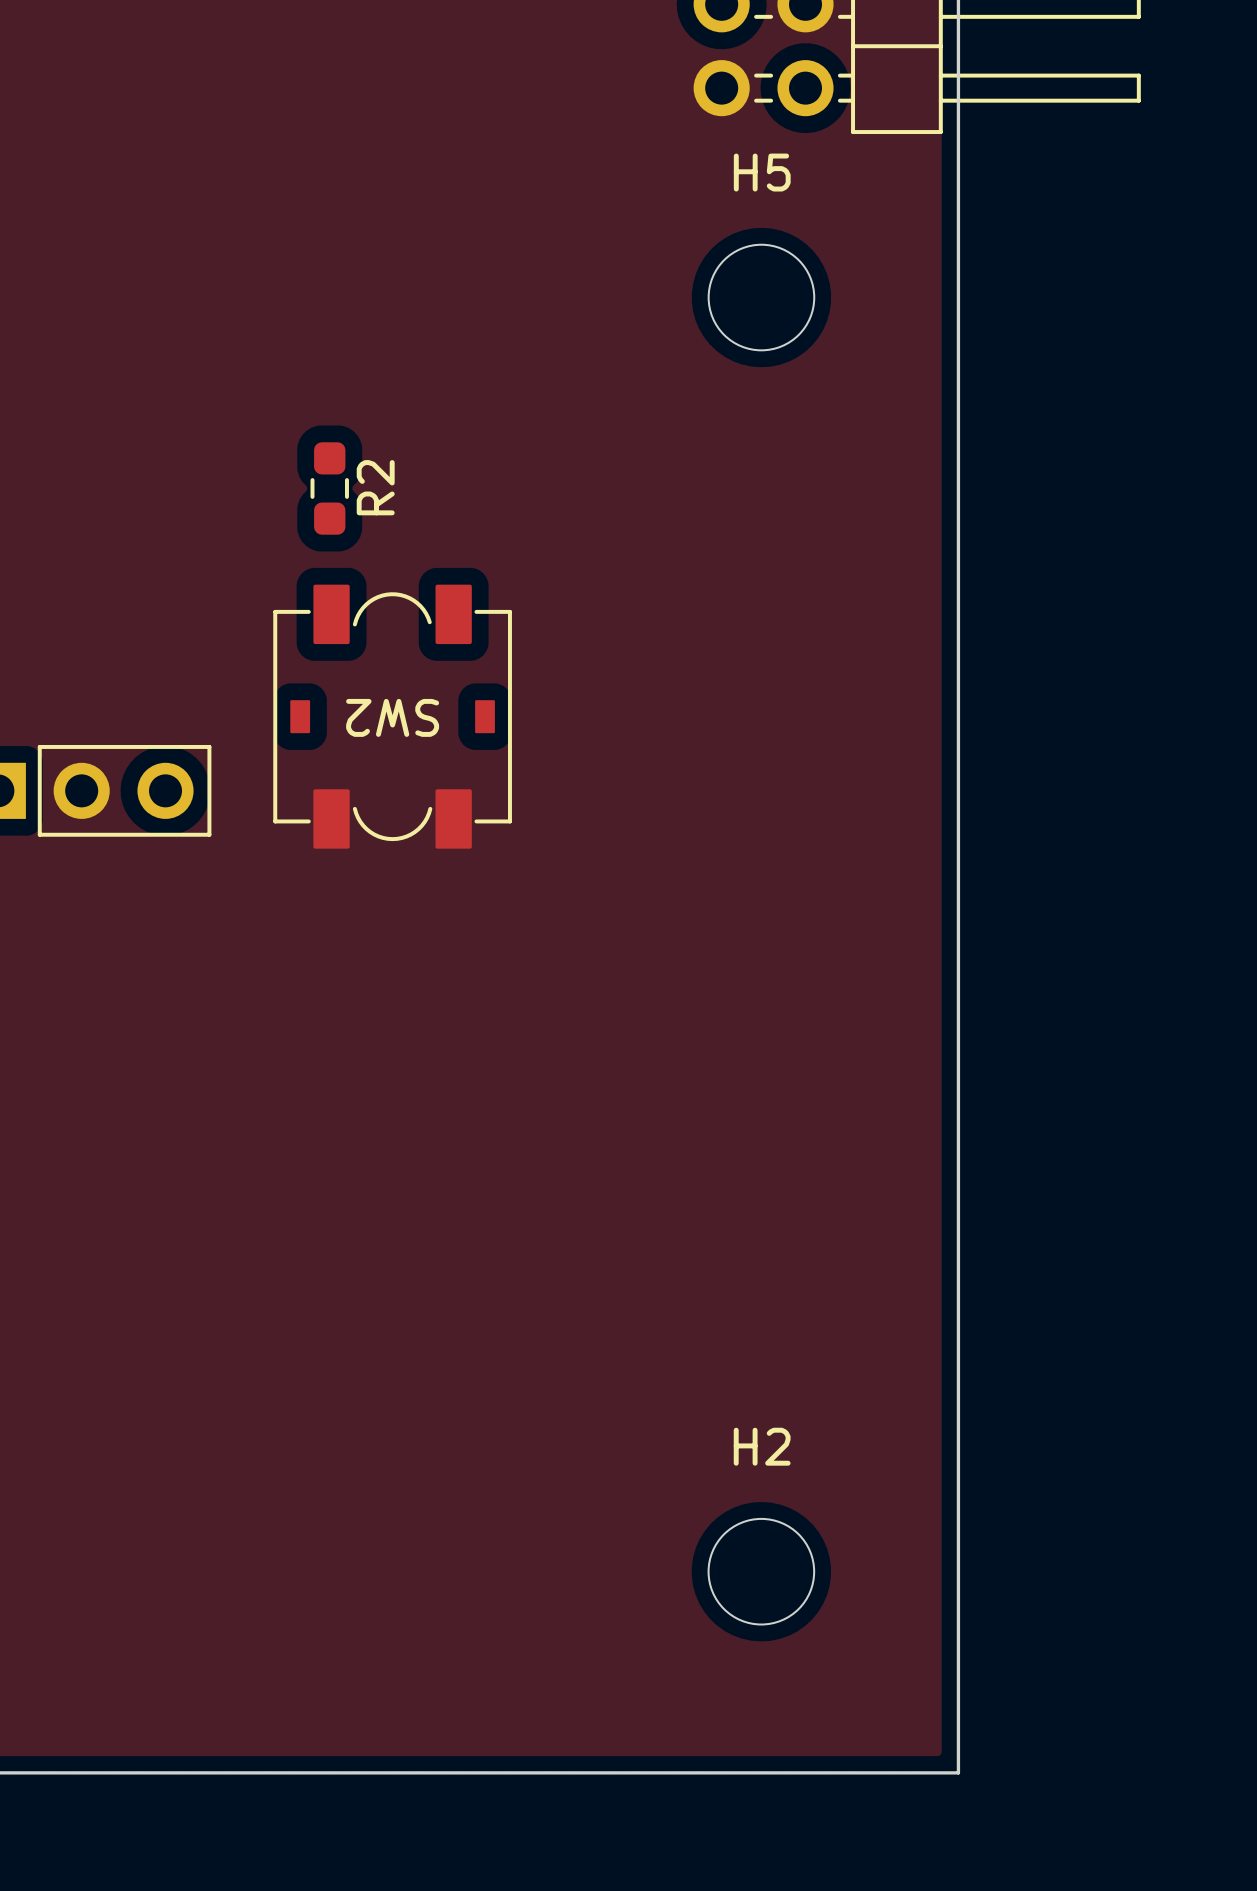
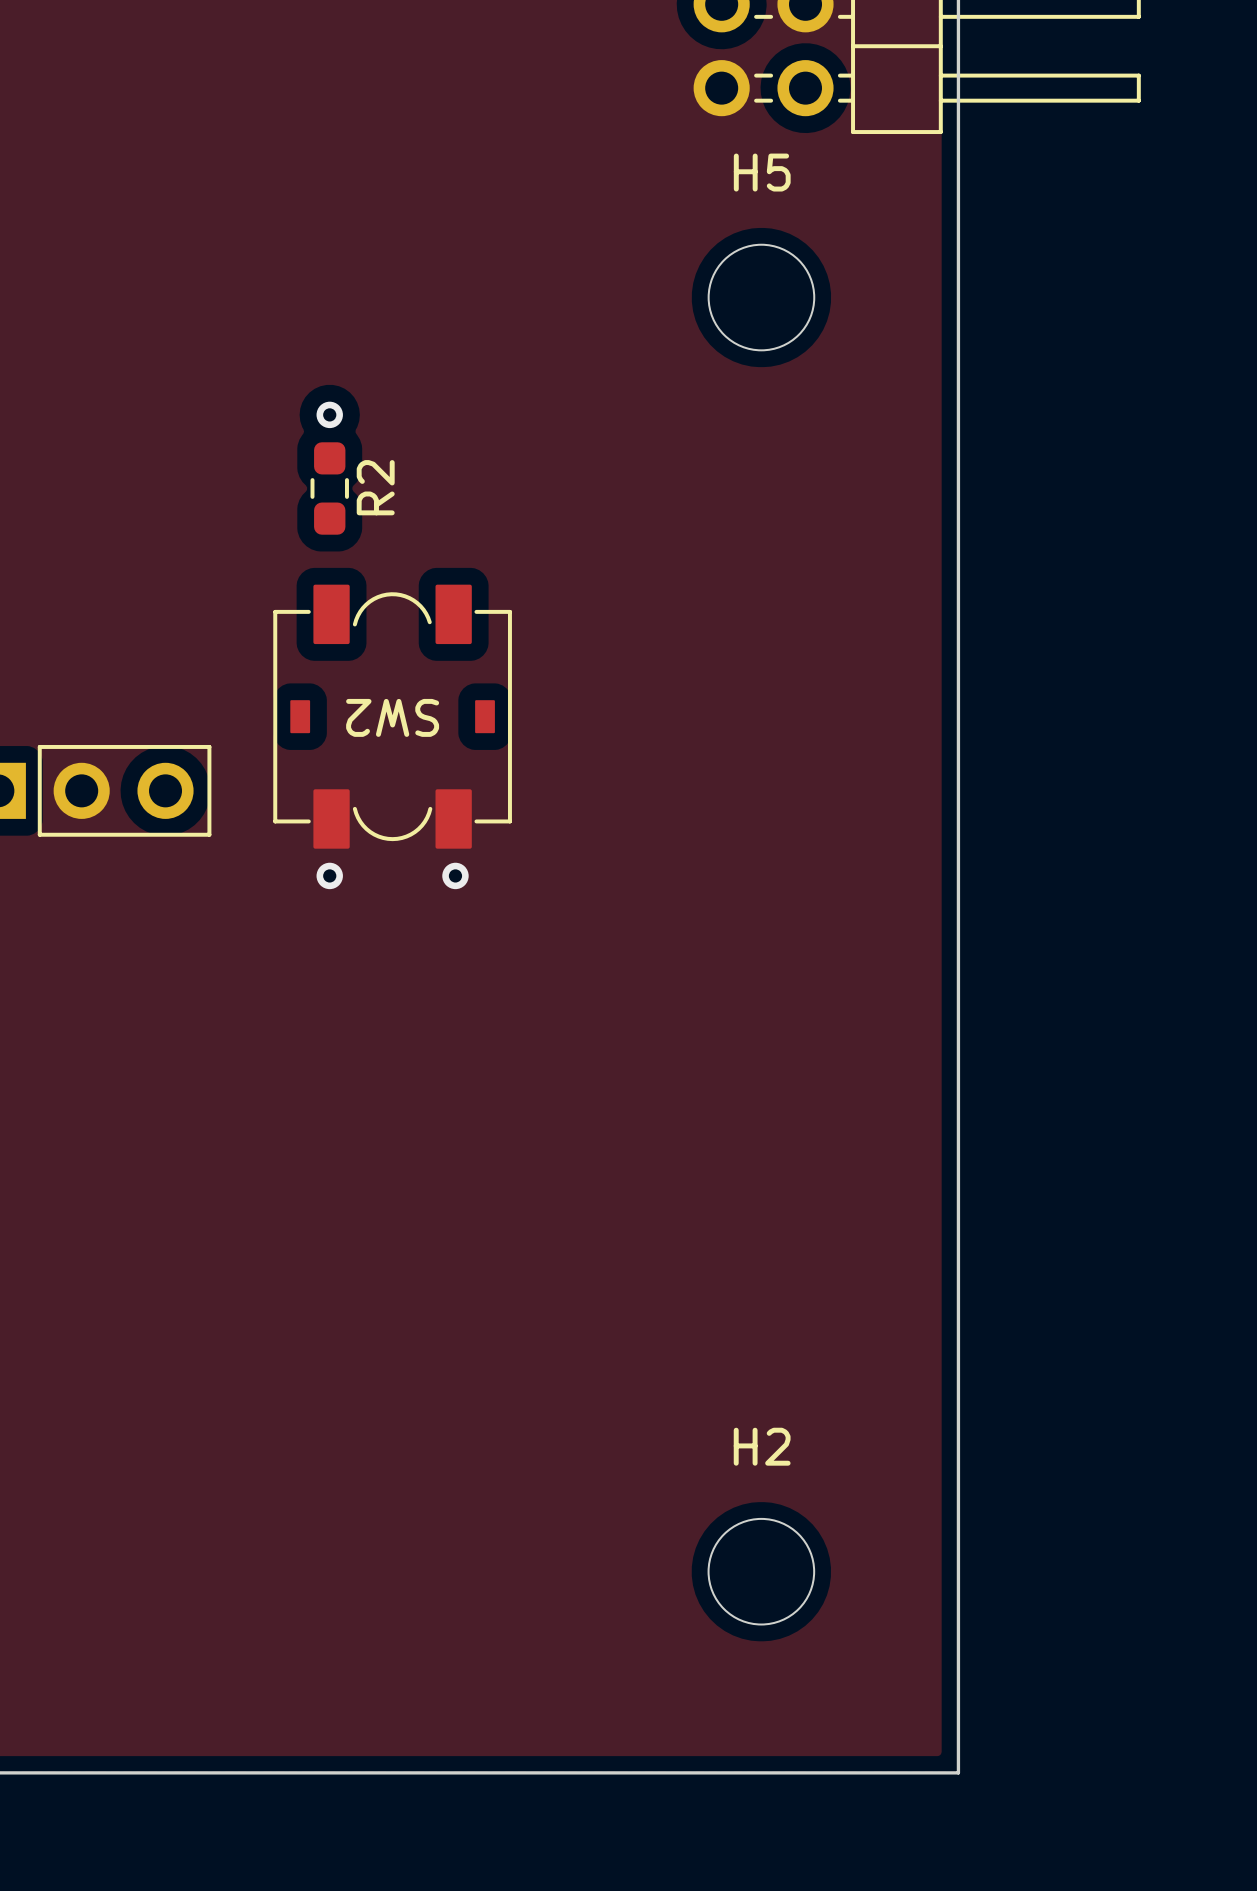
via: none -> (329, 414)
via: none -> (329, 875)
via: none -> (455, 875)

